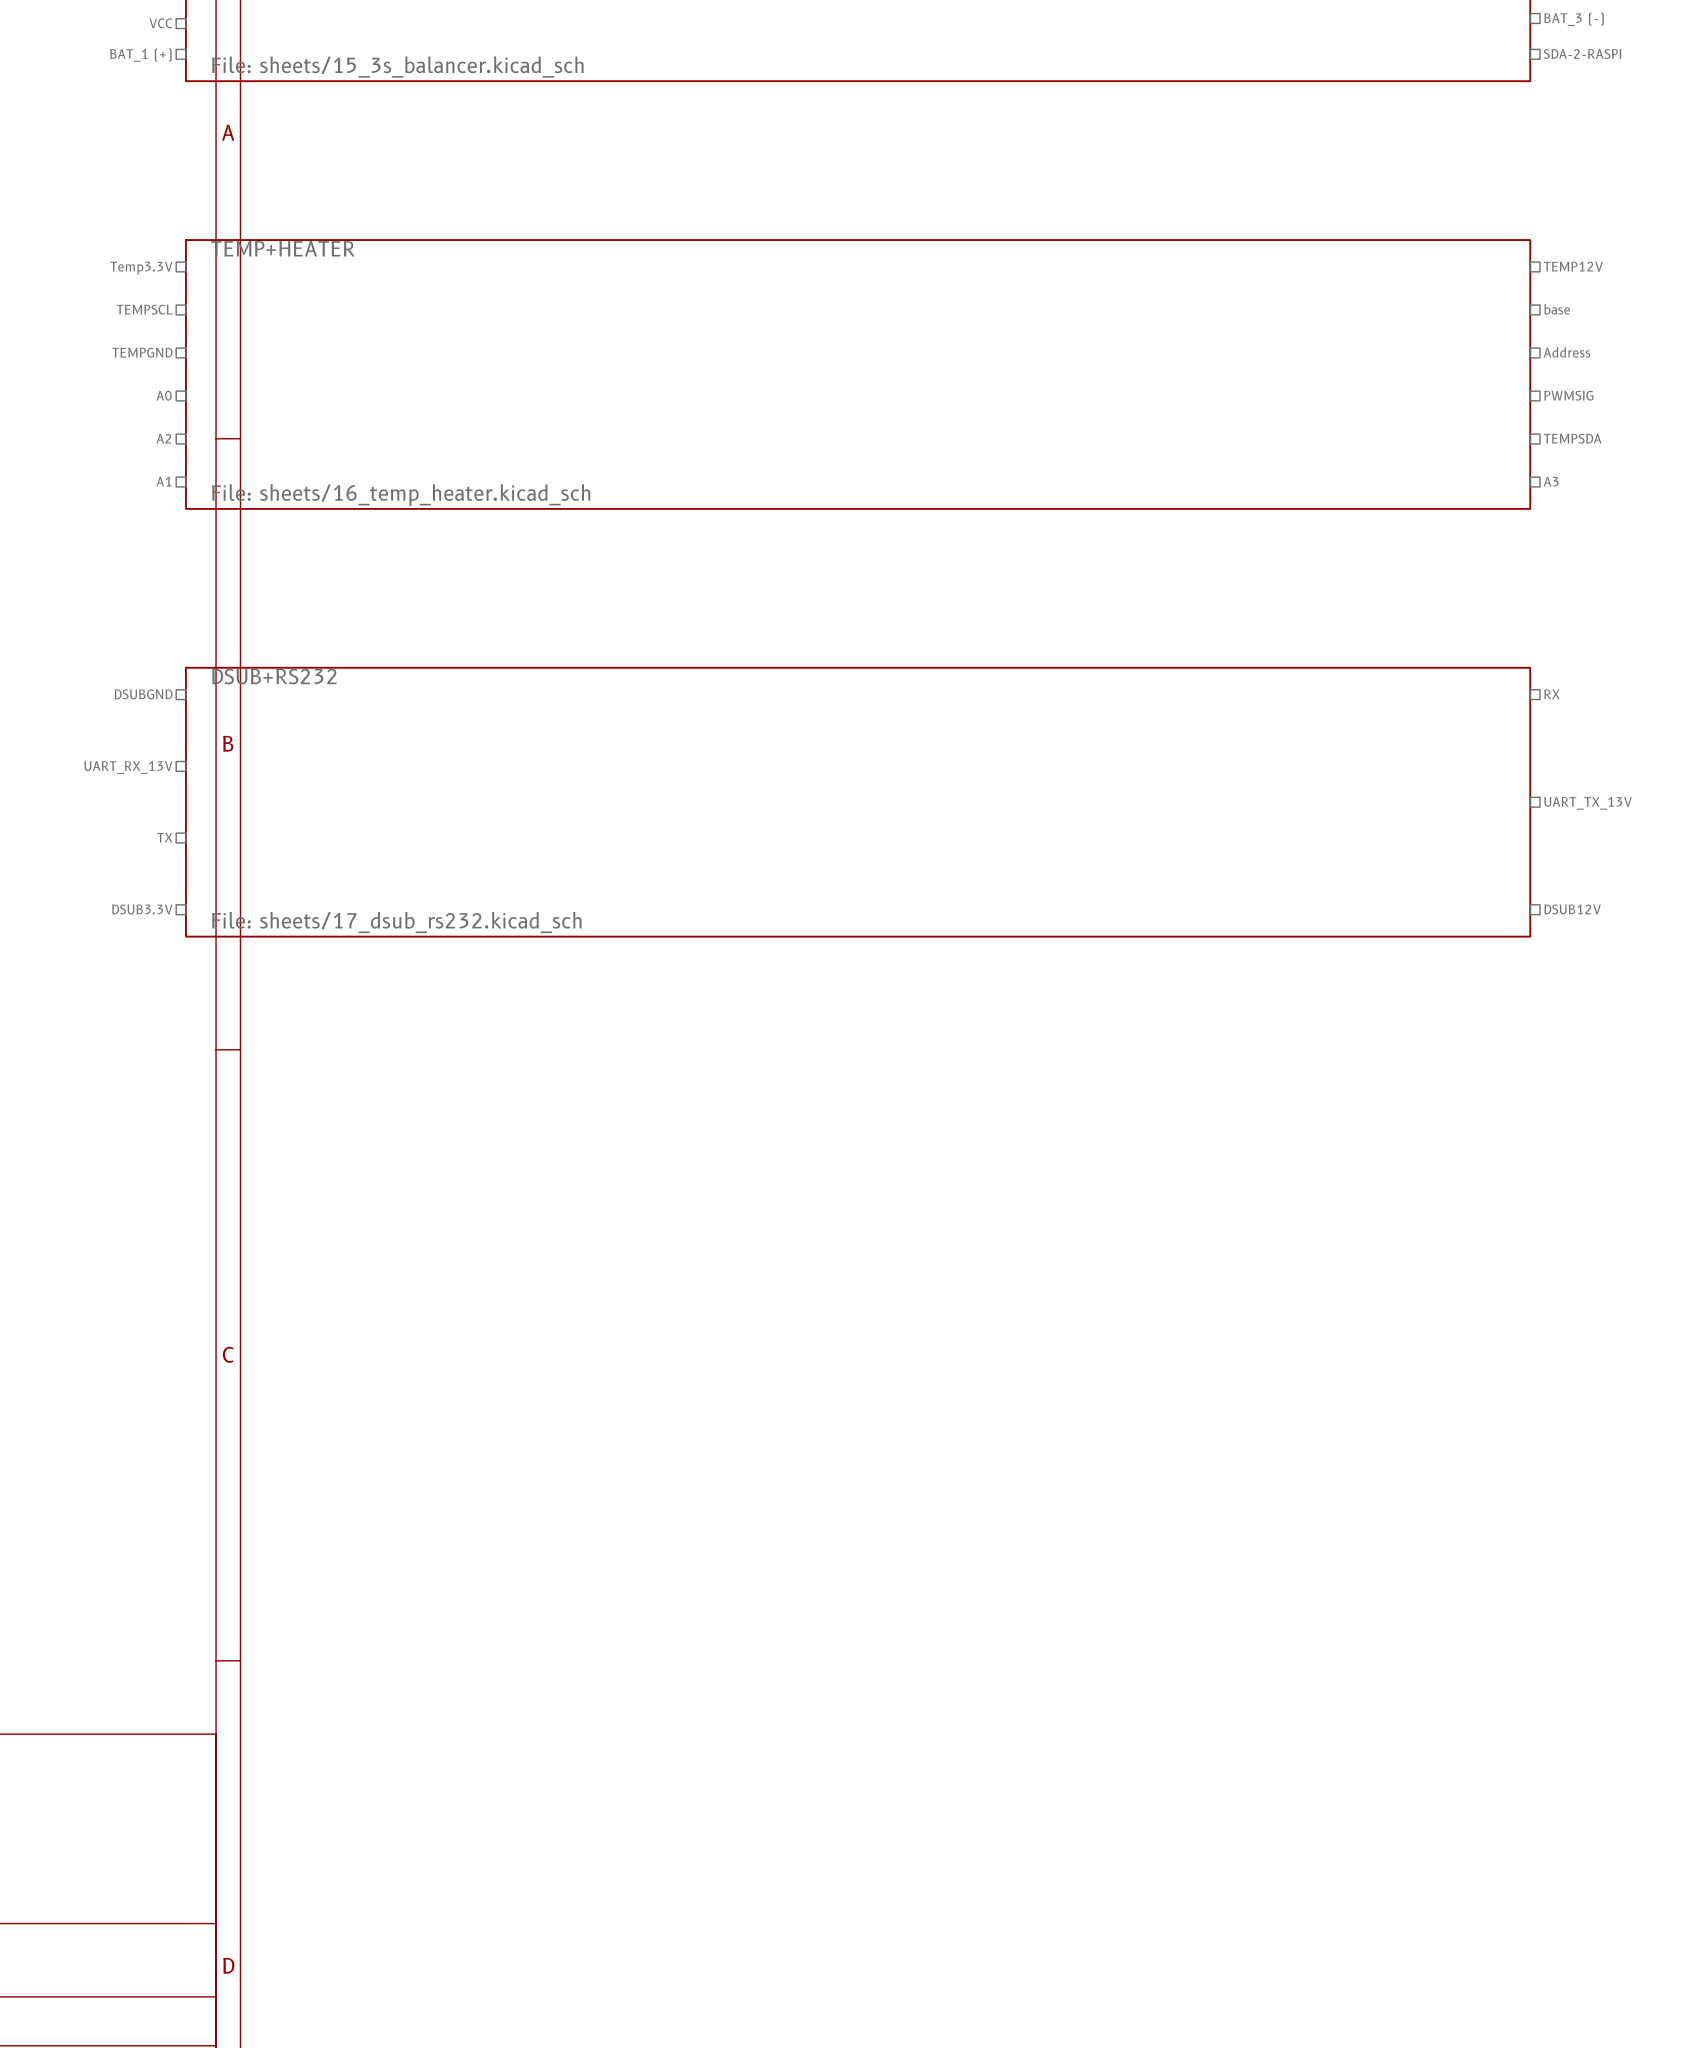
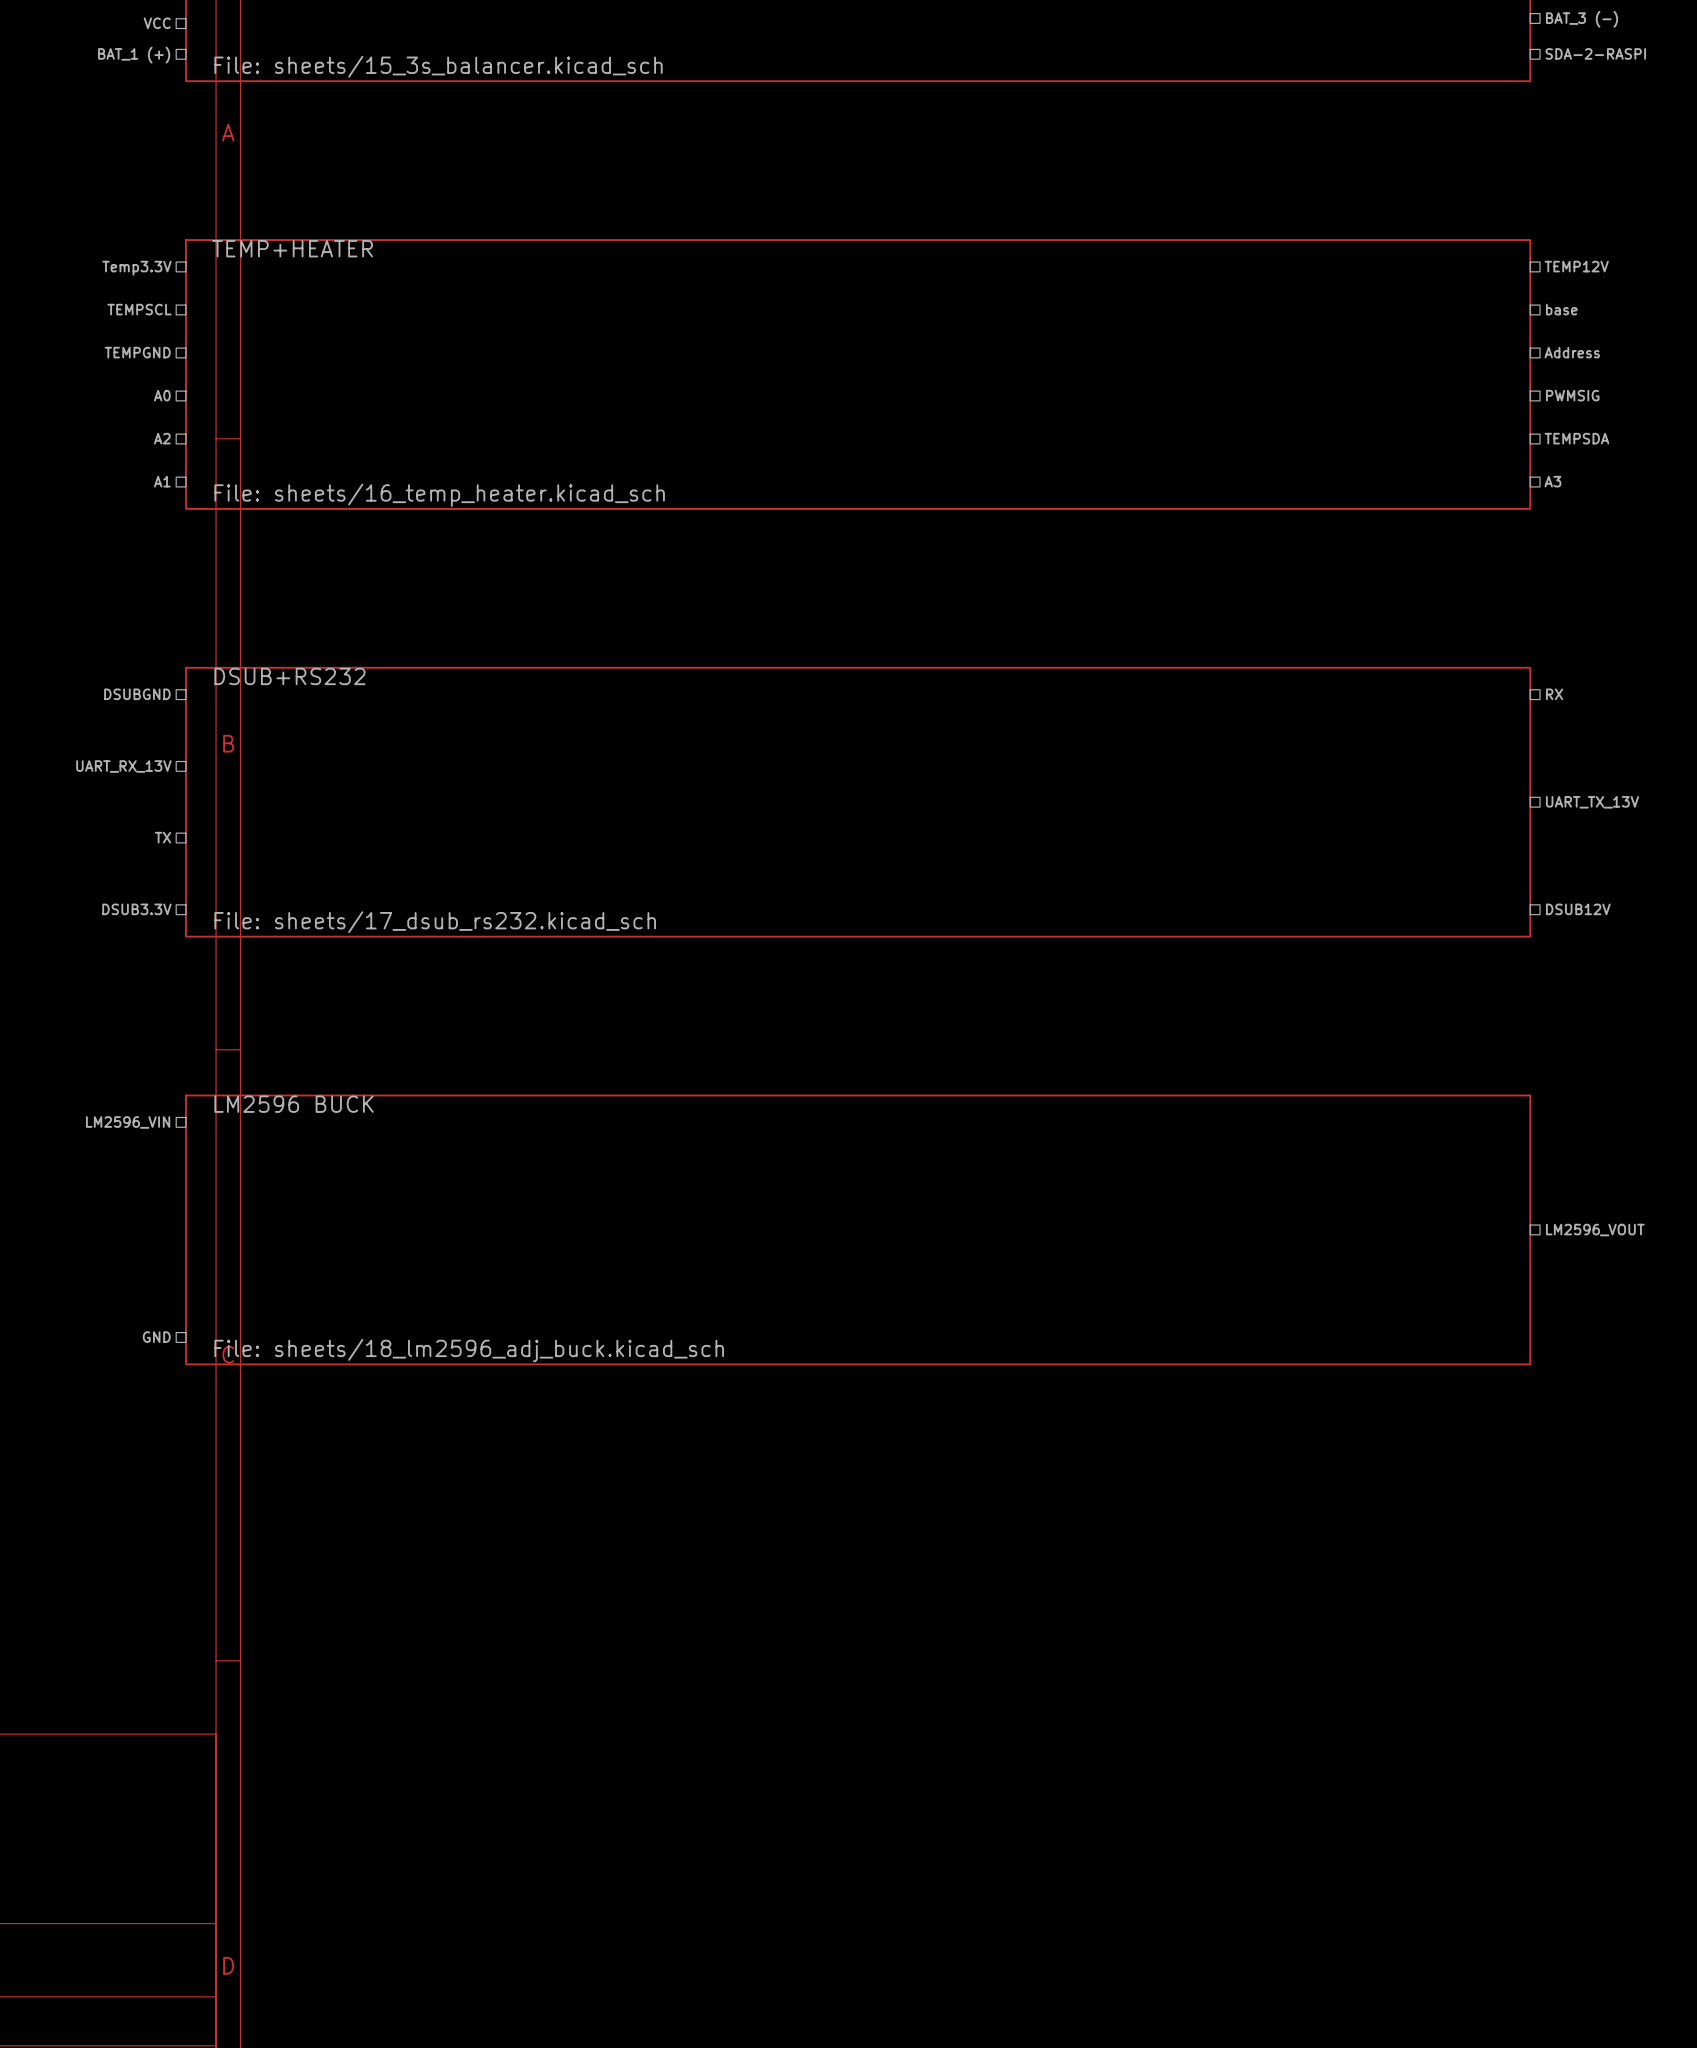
sheet pin: none -> LM2596_VIN (128, 1122)
sheet LM2596 BUCK: none -> File: sheets/18_lm2596_adj_buck.kicad_sch (858, 1229)
sheet pin: none -> LM2596_VOUT (1595, 1230)
sheet pin: none -> GND (156, 1337)

